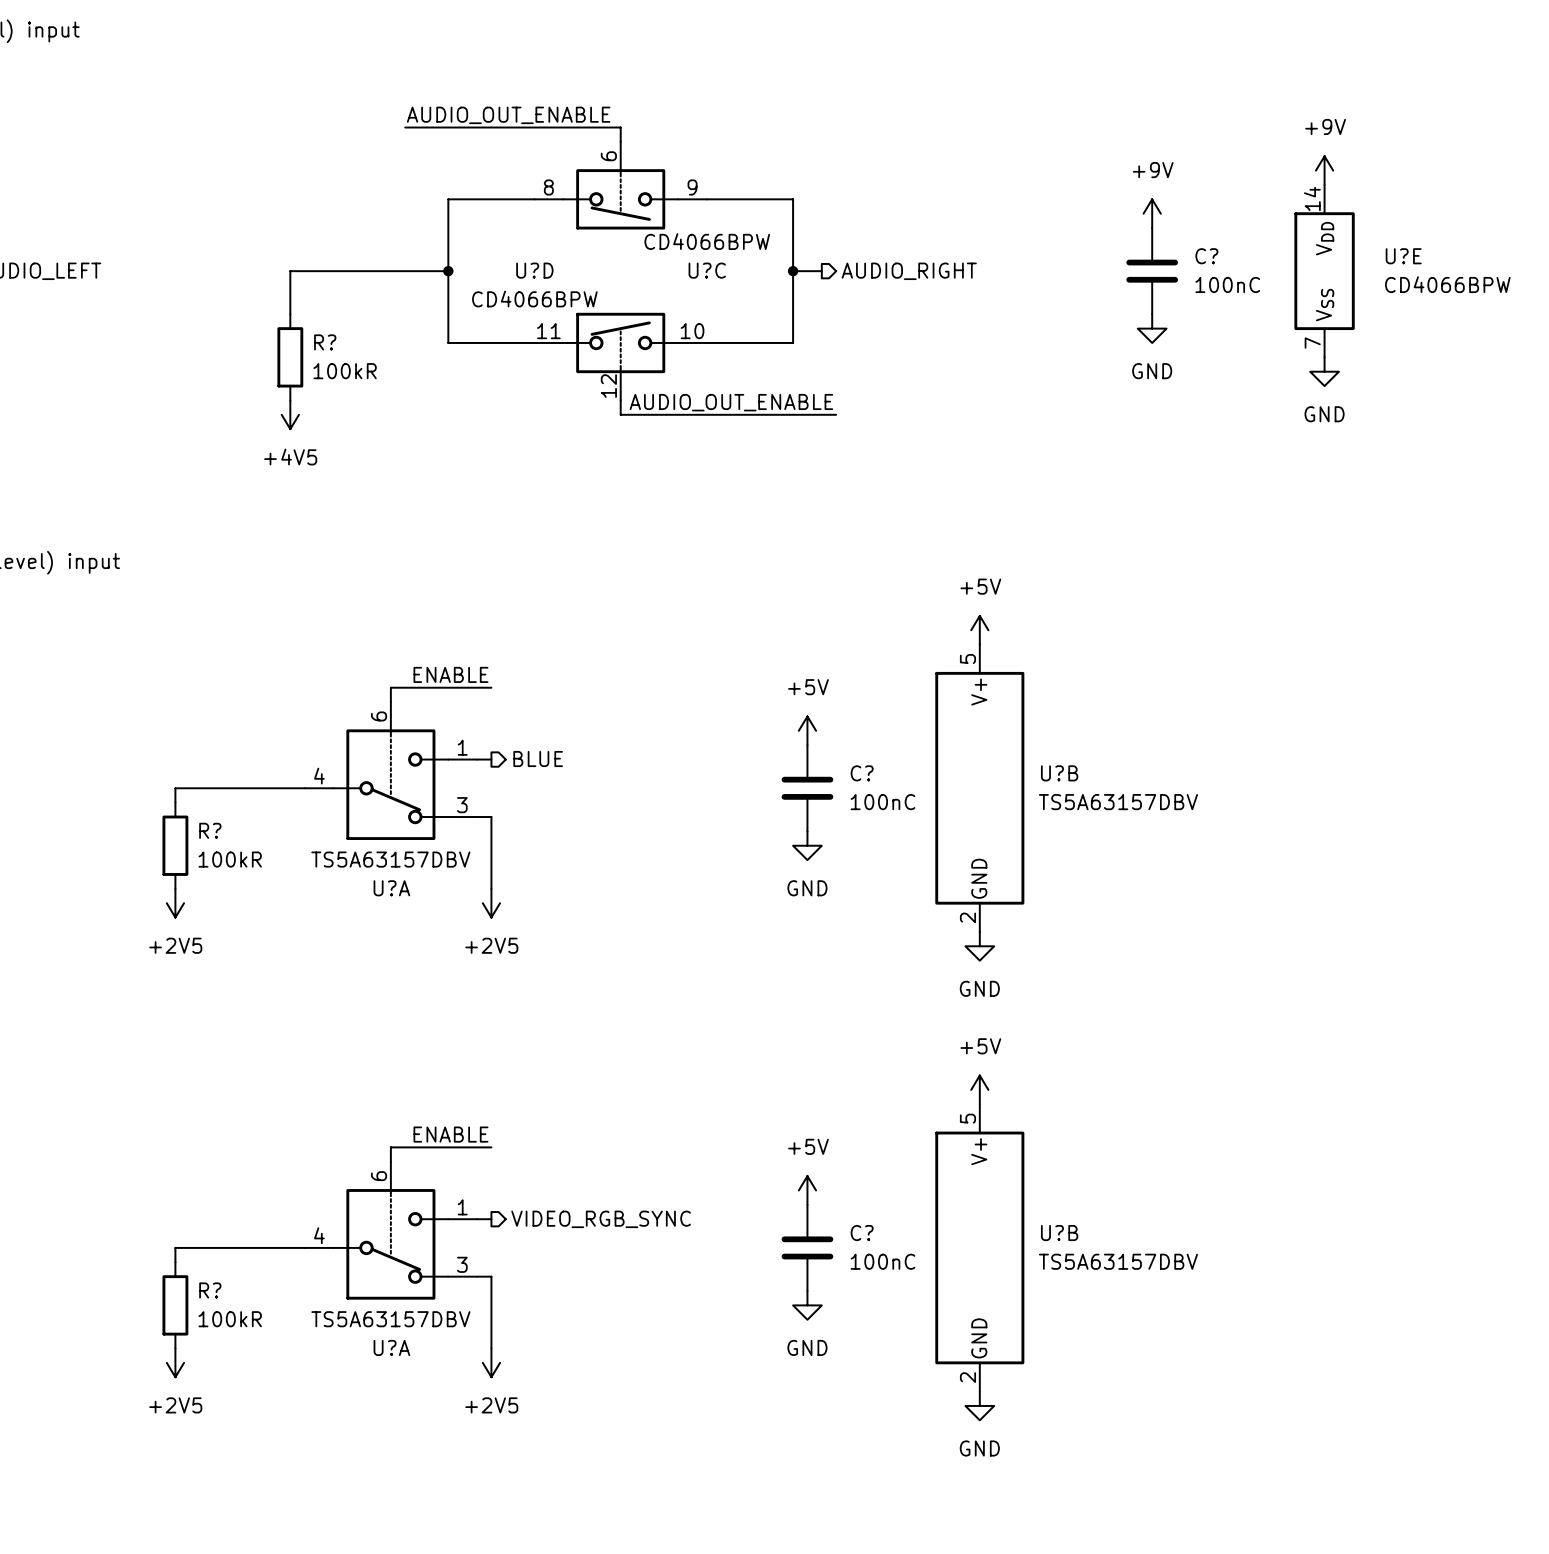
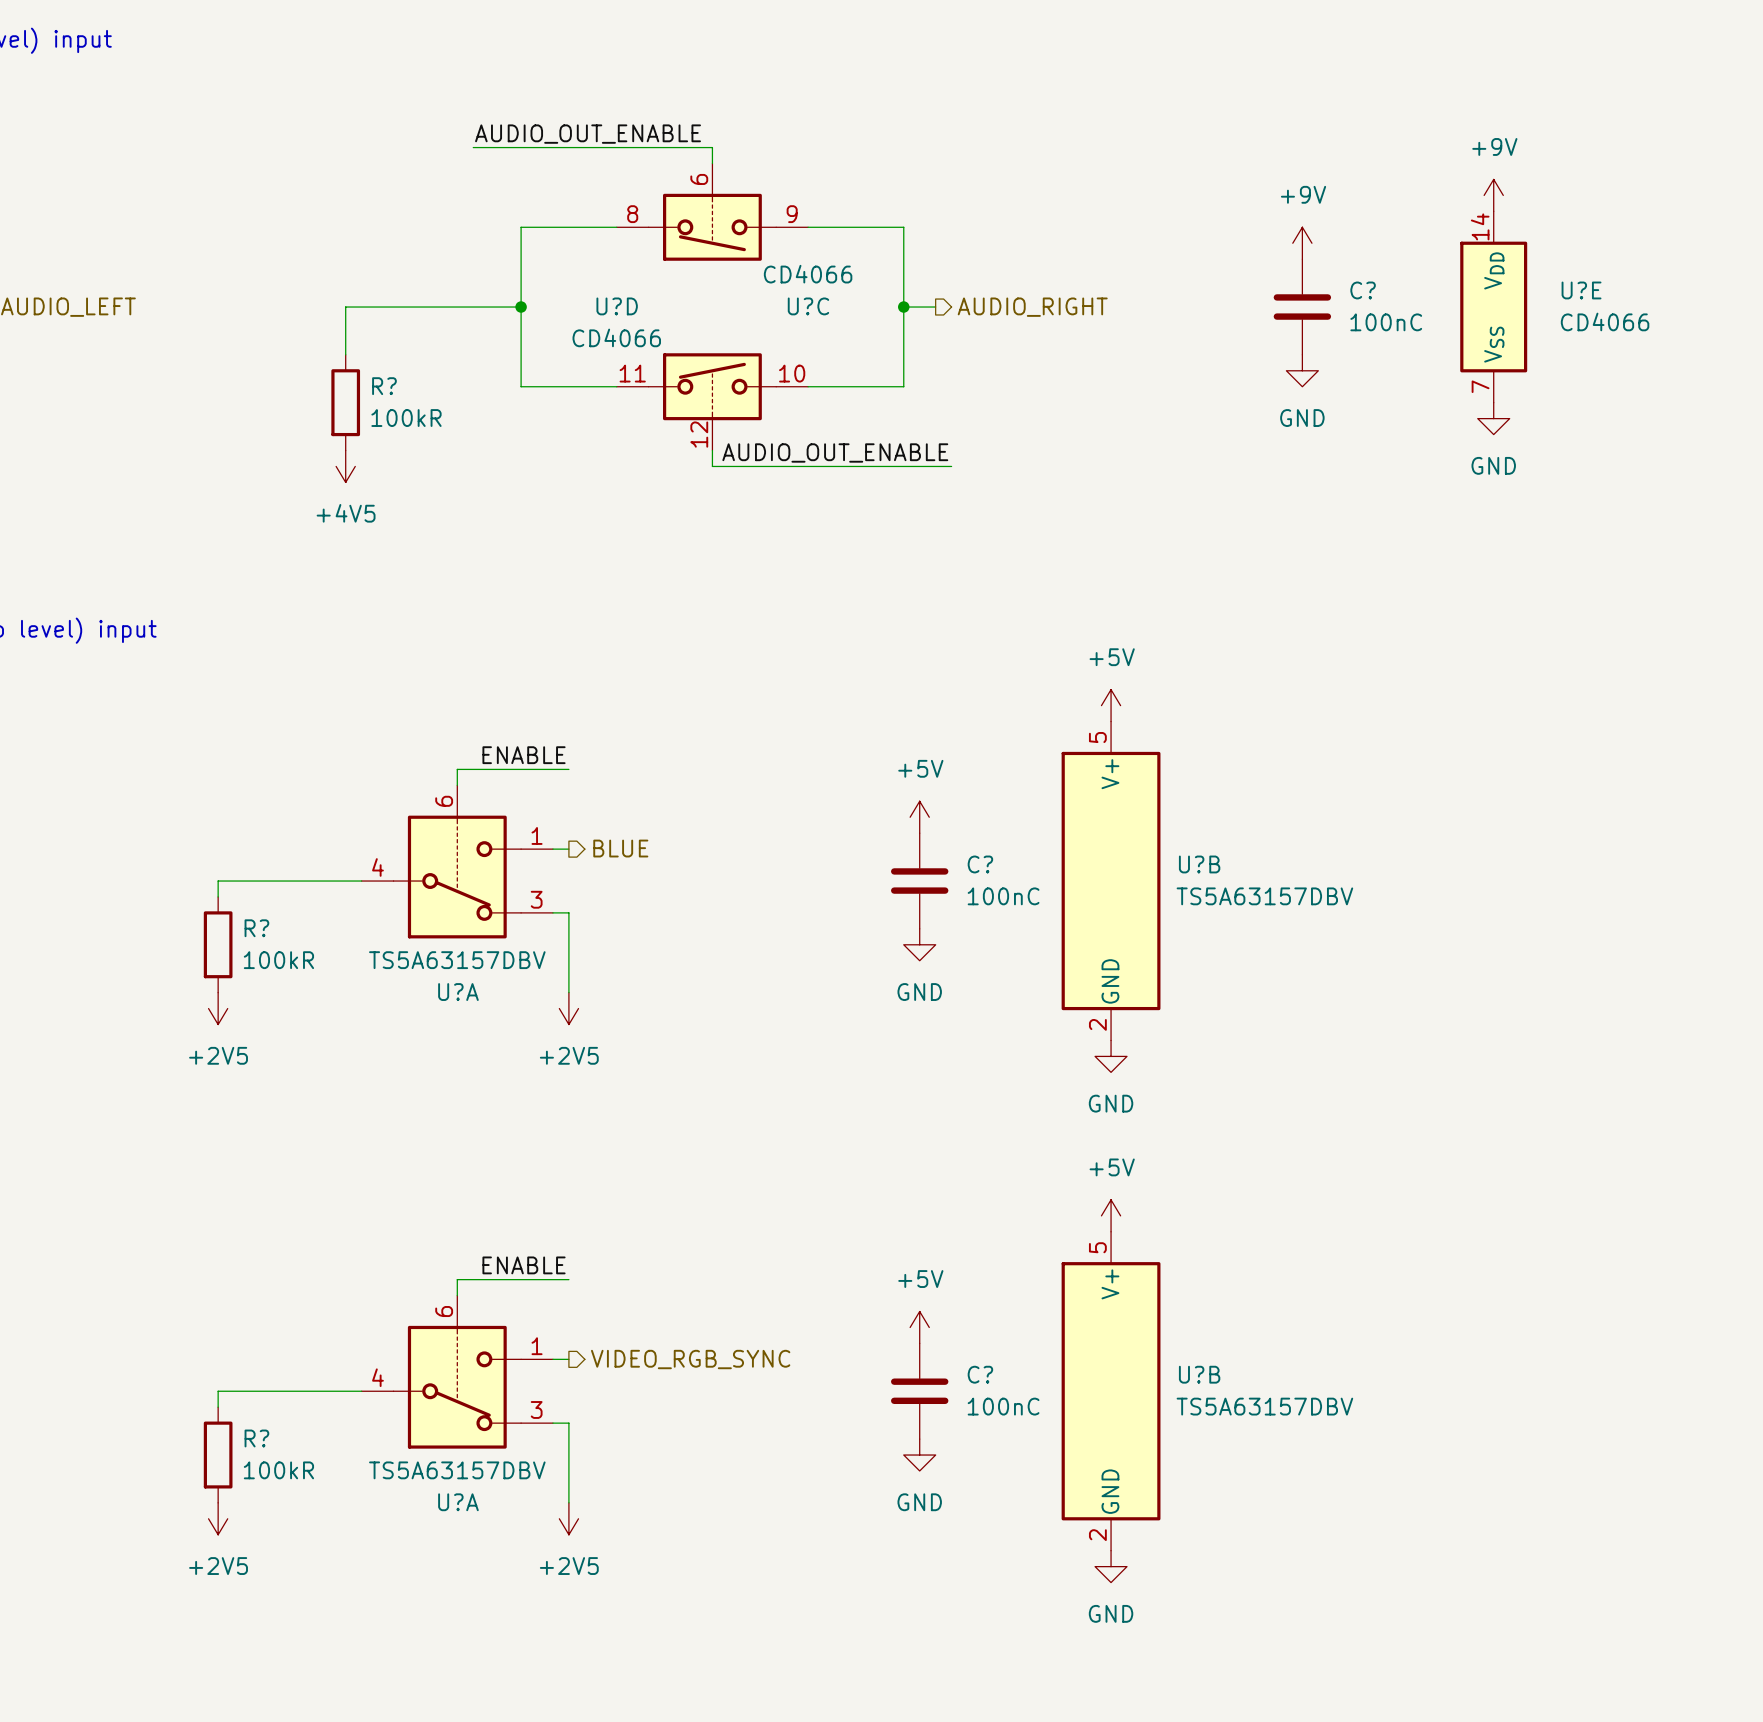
U?C value: CD4066BPW (707, 241) -> CD4066 (808, 274)
U?E value: CD4066BPW (1447, 284) -> CD4066 (1605, 321)
U?D value: CD4066BPW (534, 299) -> CD4066 (616, 337)

